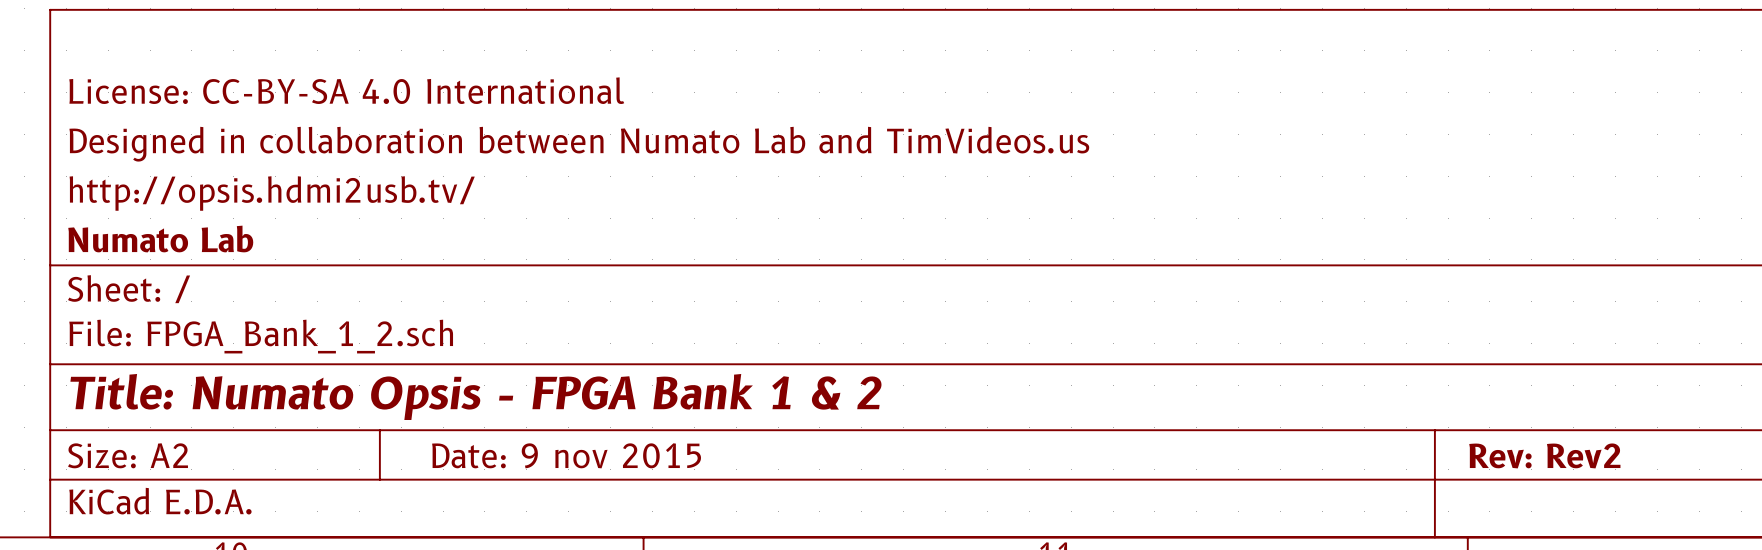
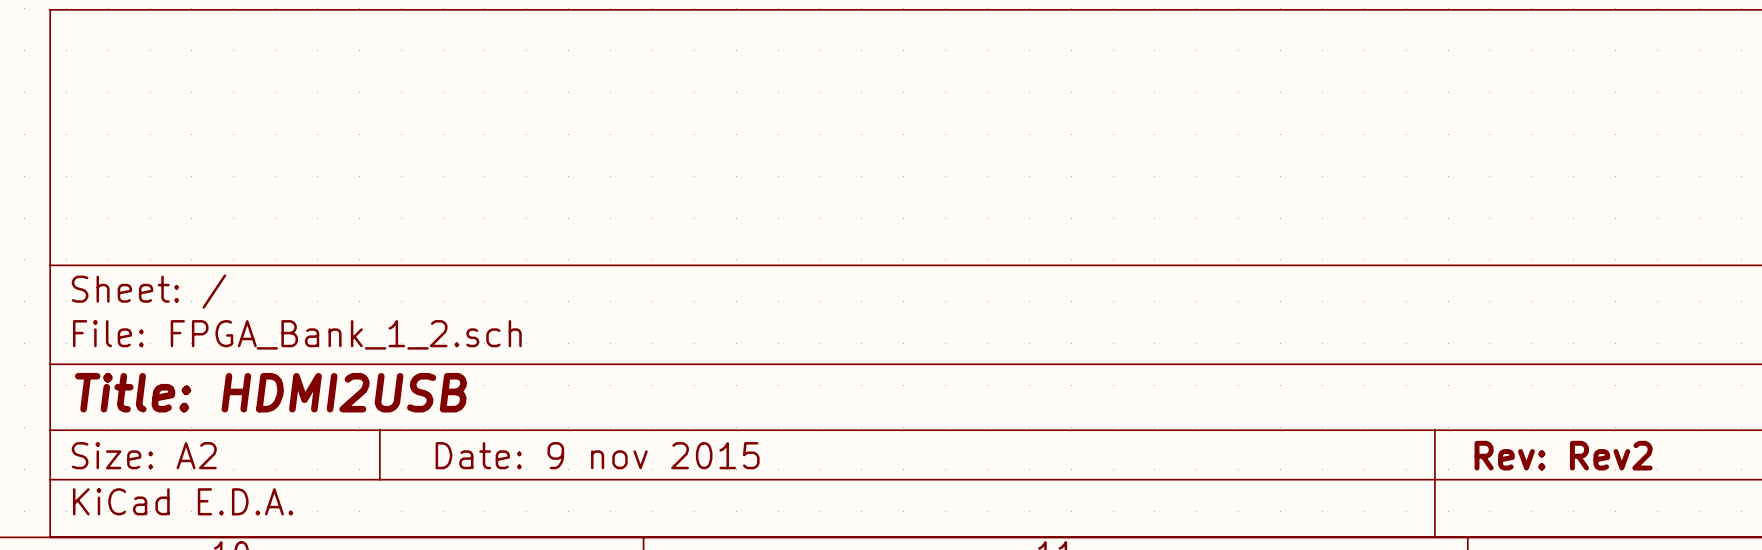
title block: License: CC-BY-SA 4.0 International (346, 90) -> none
title block: Designed in collaboration between Numato Lab and TimVideos.us (579, 144) -> none
title block: http://opsis.hdmi2usb.tv/ (272, 193) -> none
title block: Numato Lab (160, 239) -> none
title block: Title: Numato Opsis - FPGA Bank 1 & 2 (476, 396) -> Title: HDMI2USB (270, 392)

